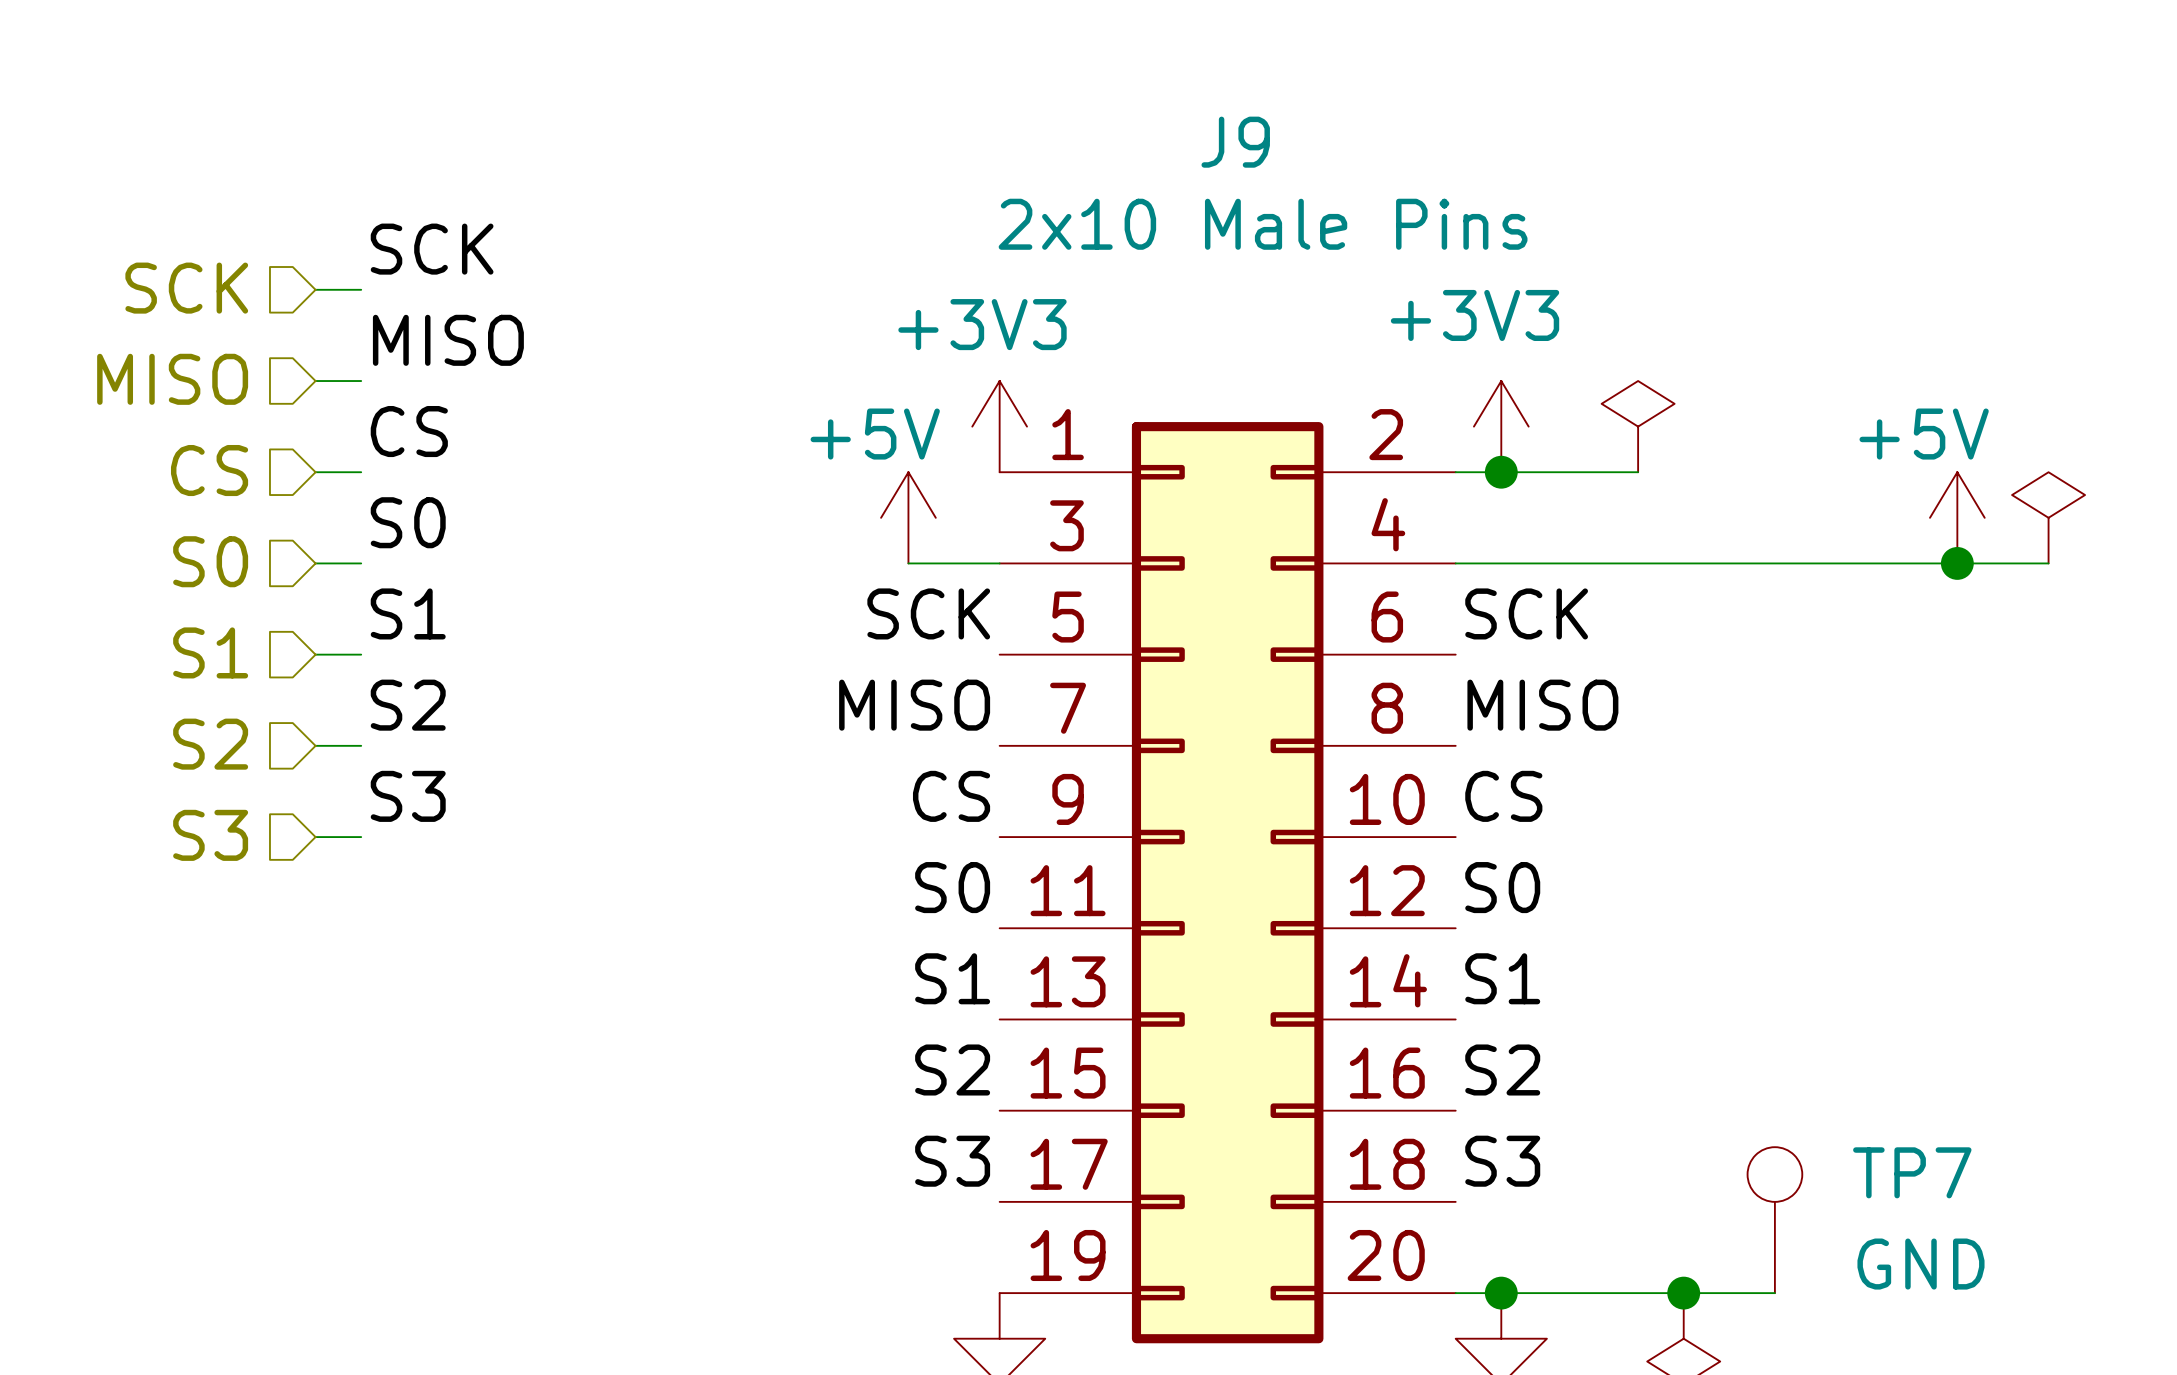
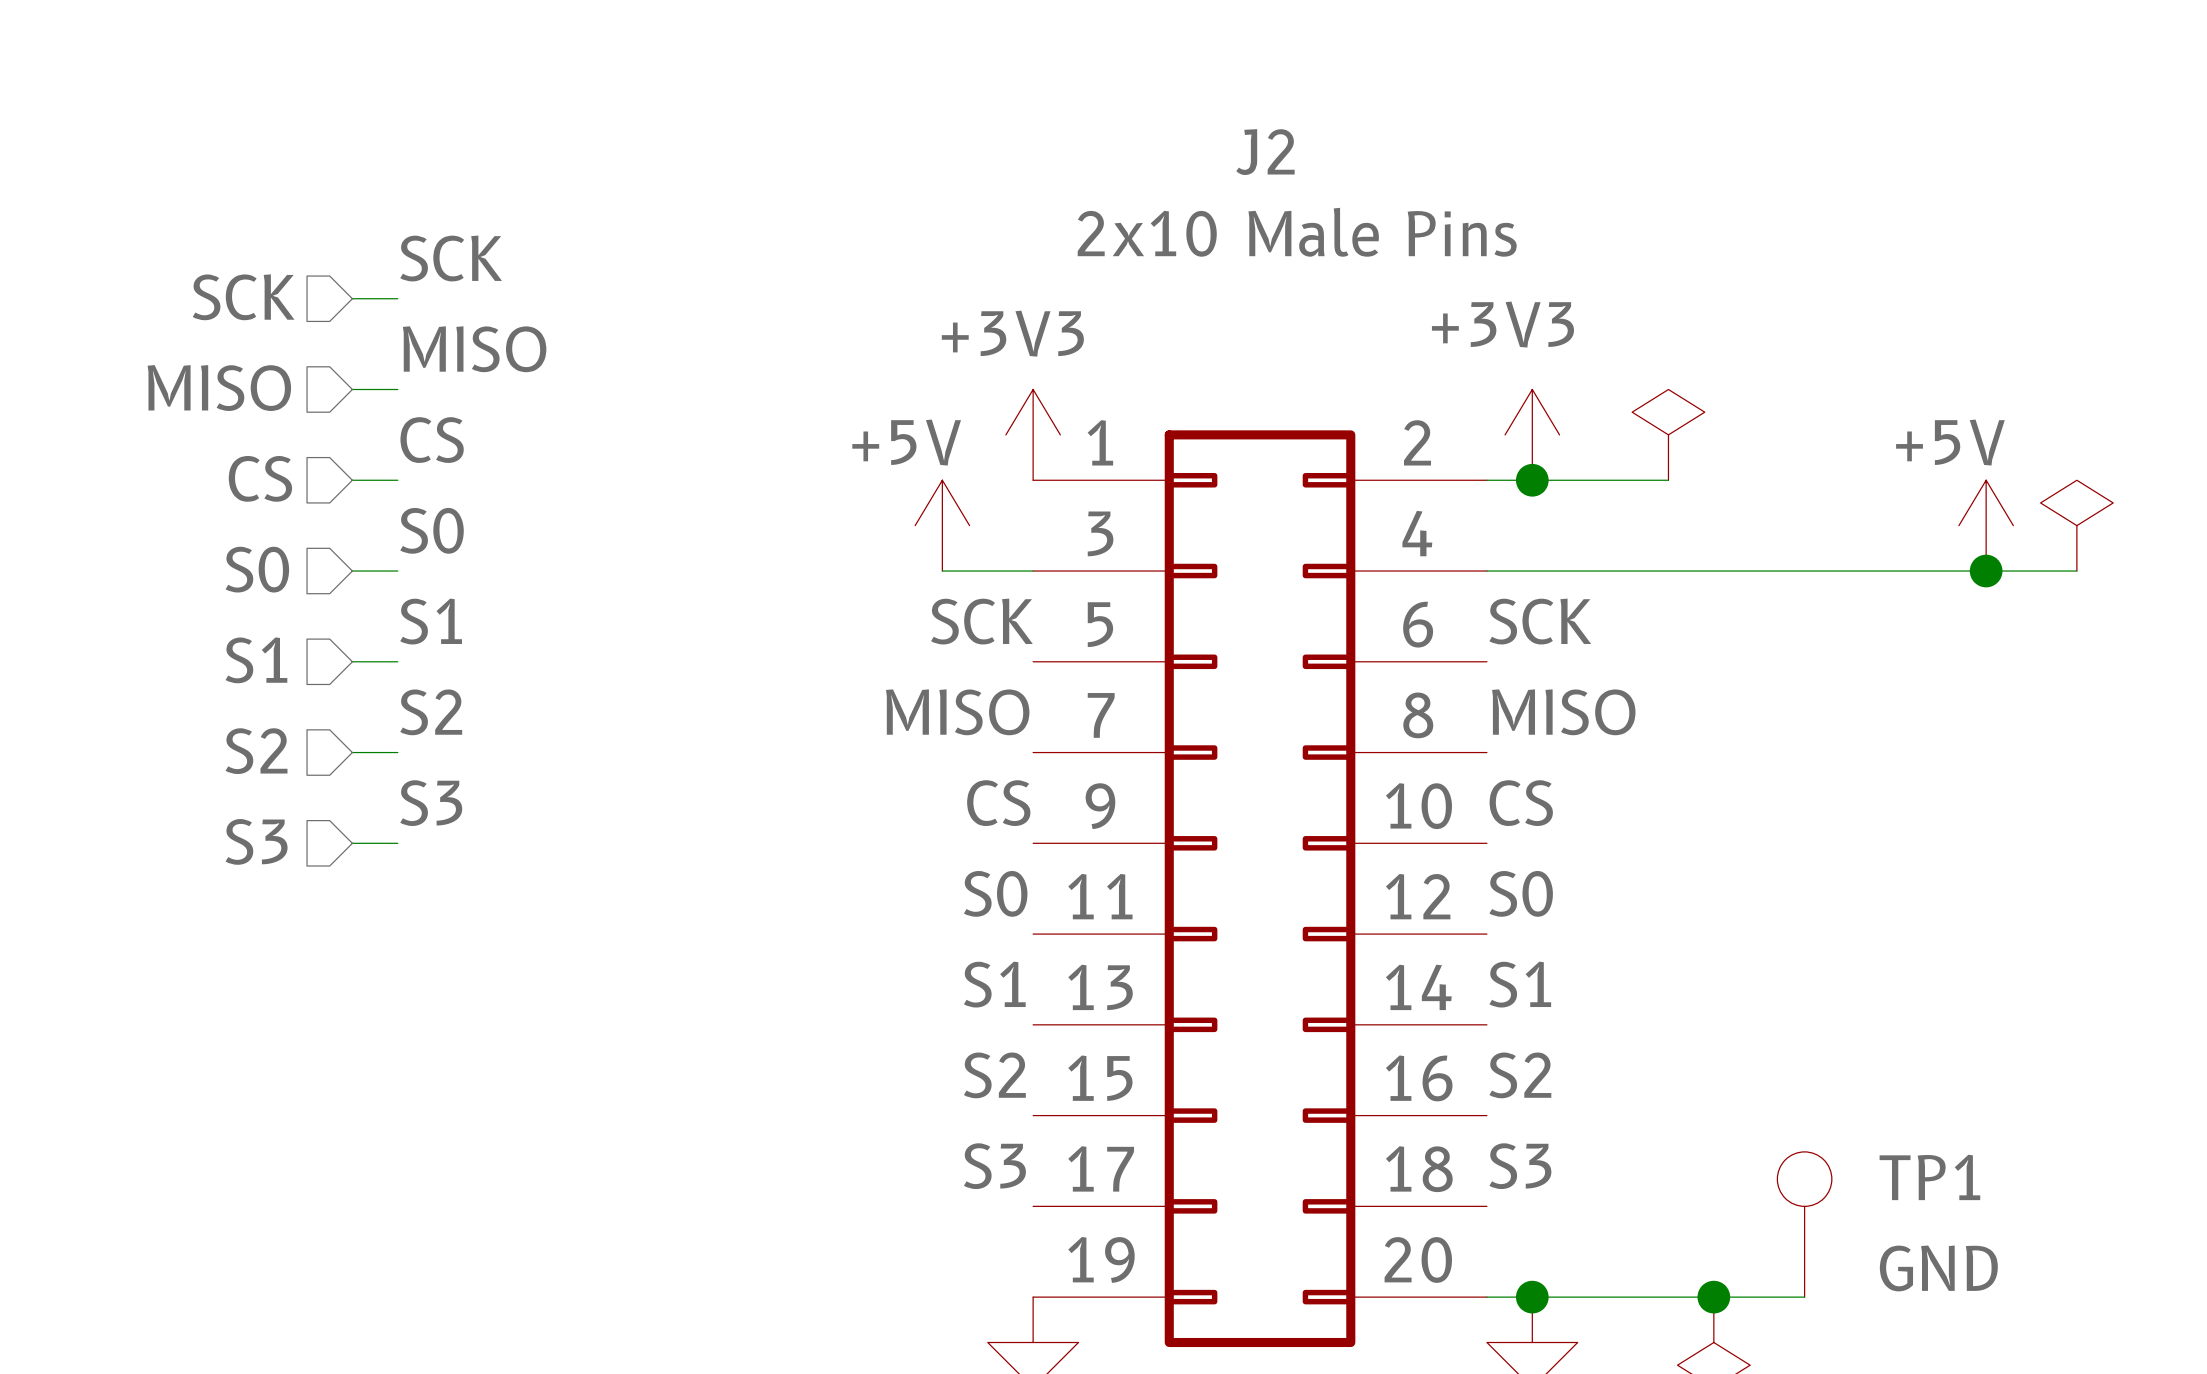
J9 name: J9 (1235, 142) -> J2 (1265, 152)
TP7 name: TP7 (1912, 1172) -> TP1 (1929, 1177)

